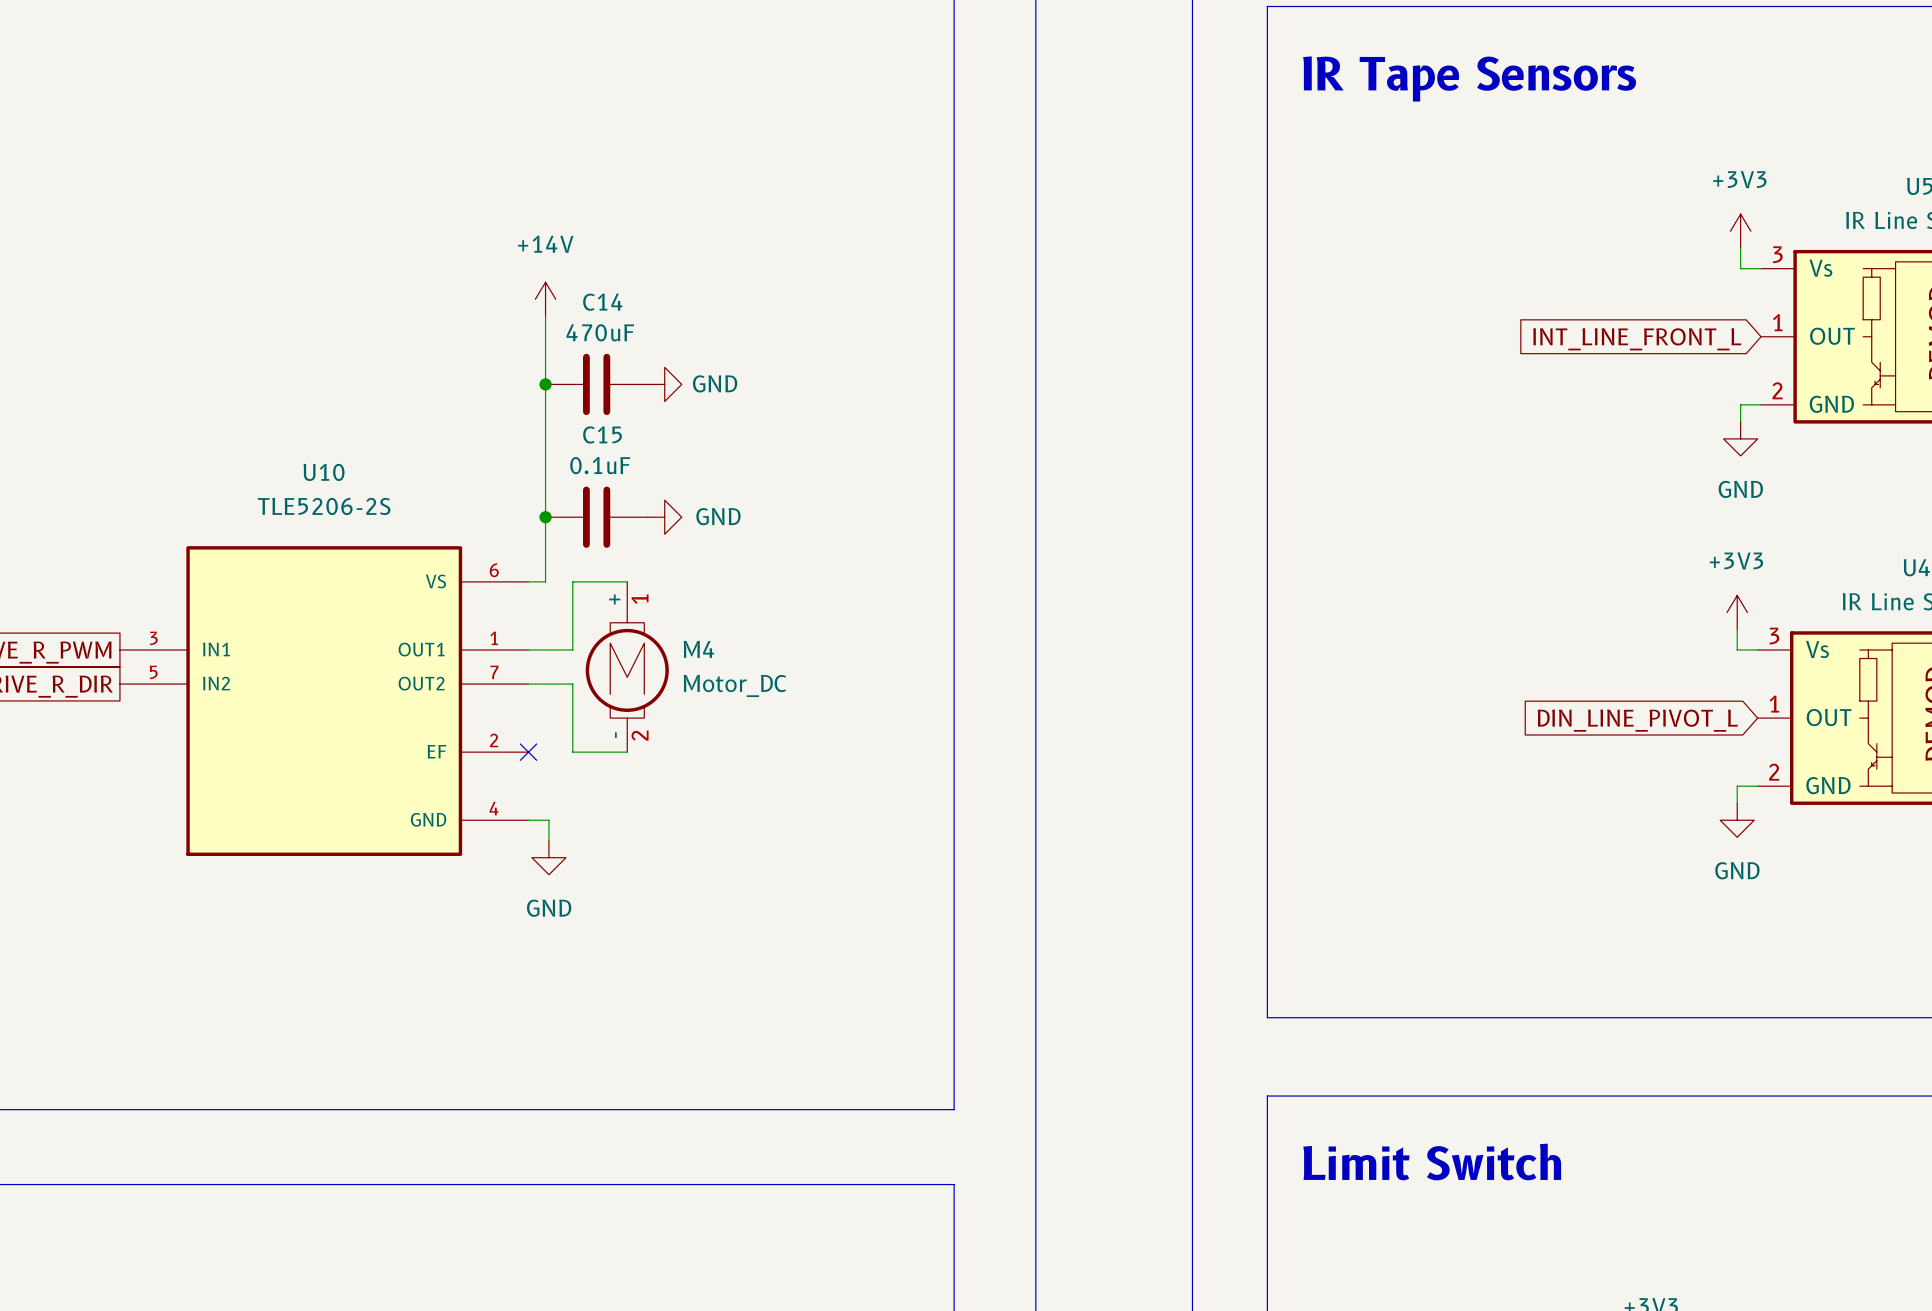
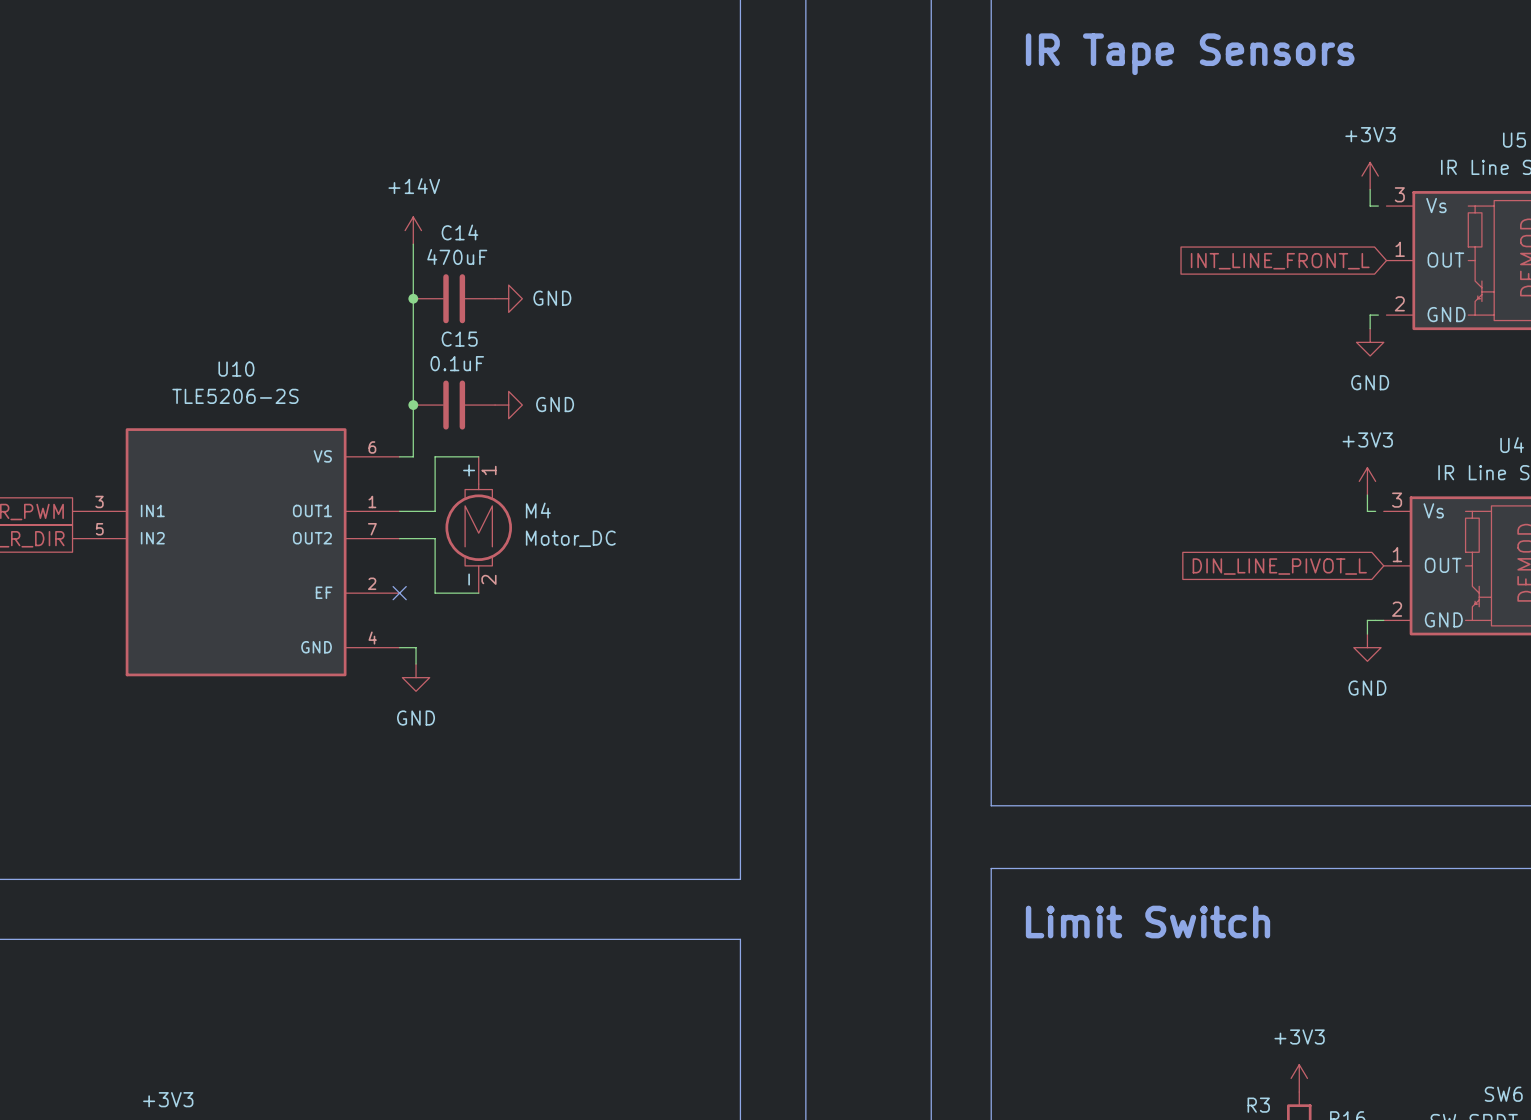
wire: (1750, 268) (1761, 268) -> none
wire: (1750, 404) (1761, 404) -> none
wire: (1747, 650) (1757, 650) -> none

